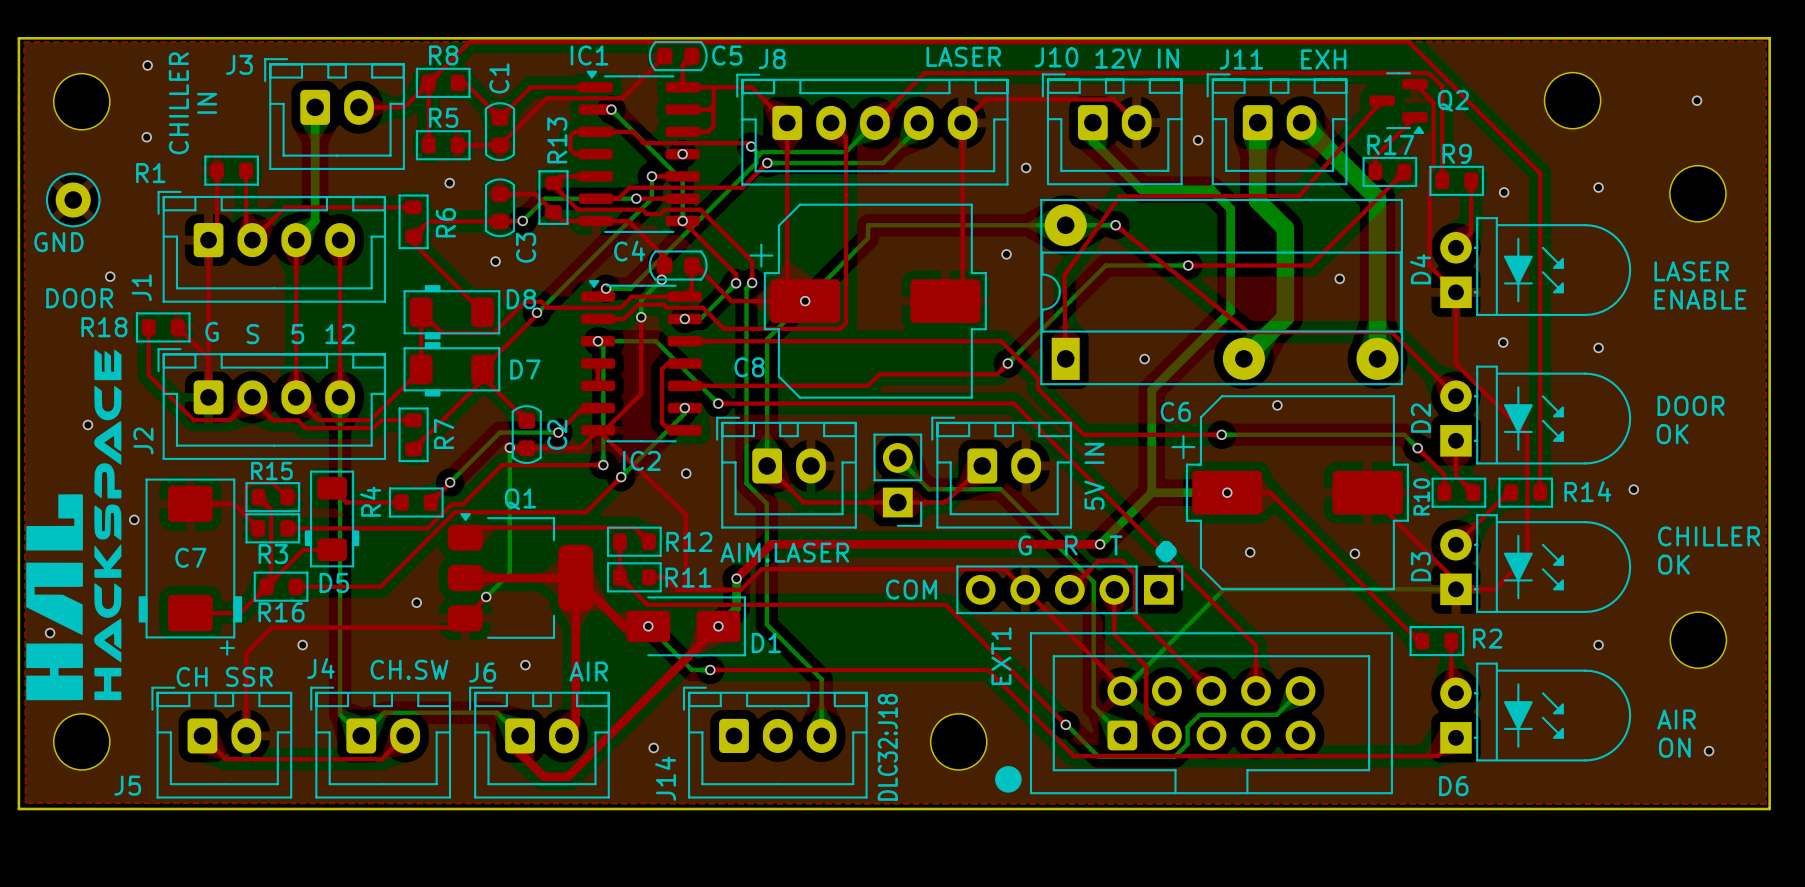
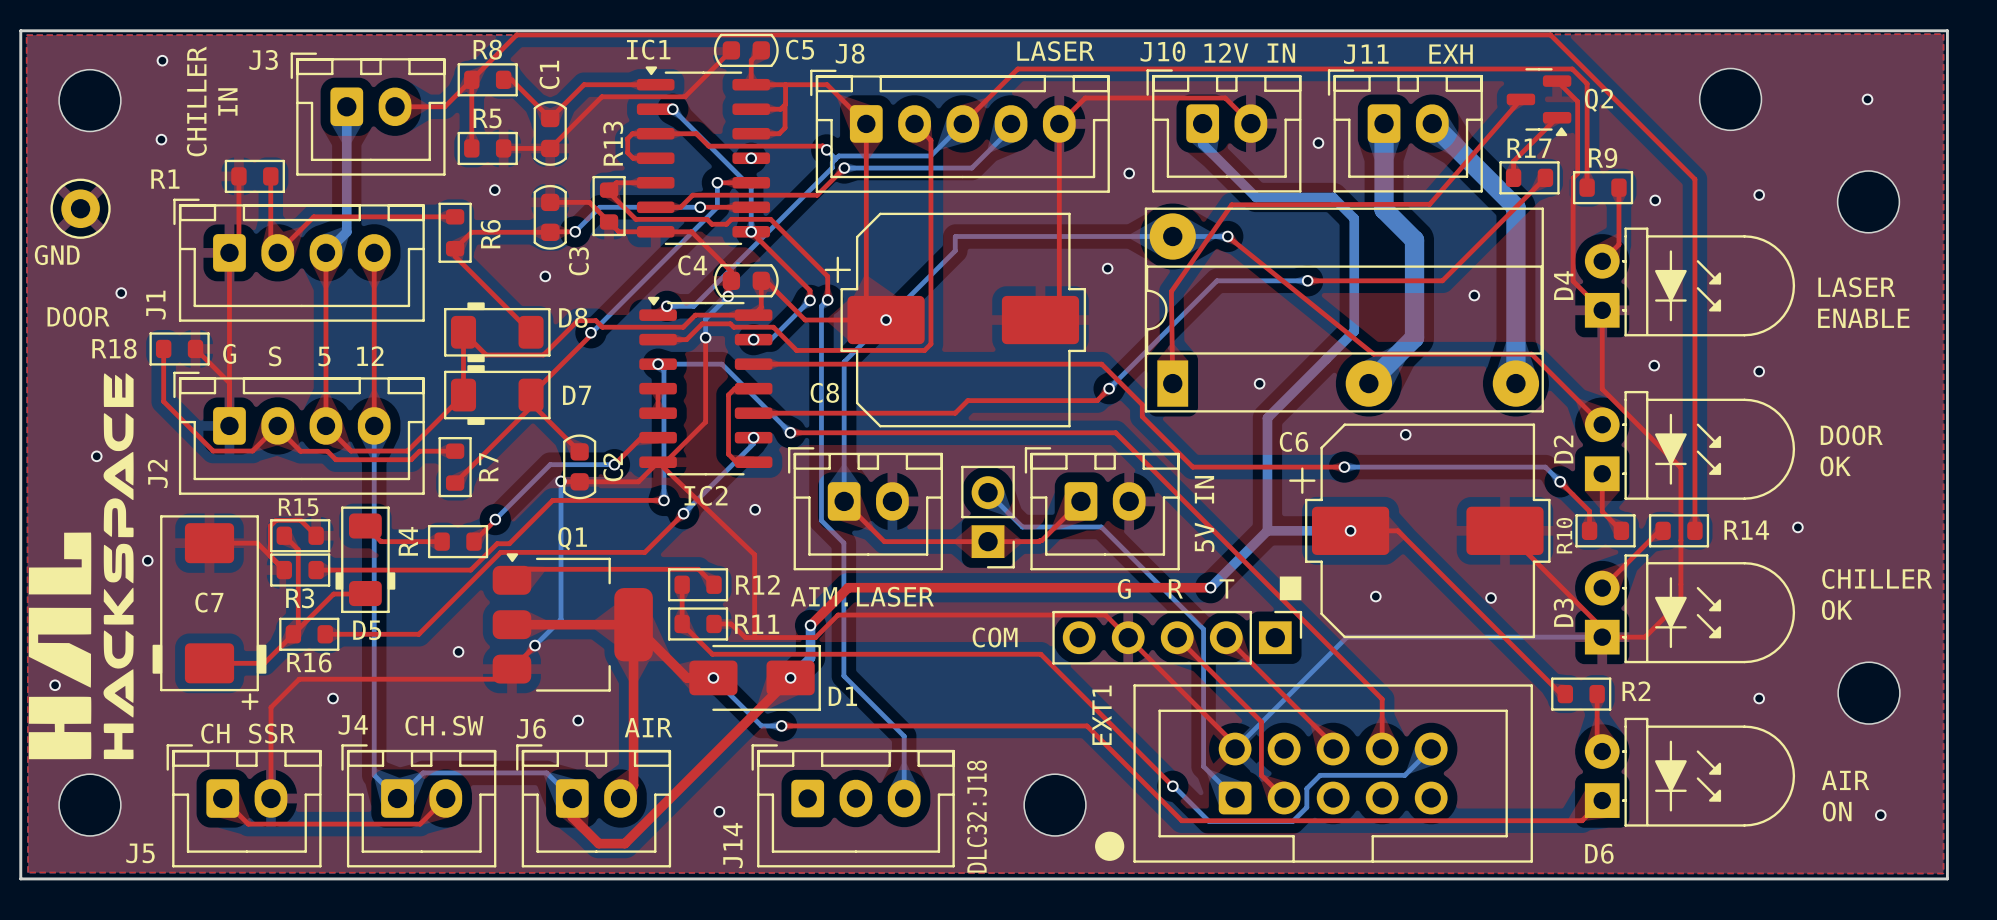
top track: (1069, 589) (1098, 560) (1121, 560) (1134, 573) (1134, 614) (1211, 690) -> none
top track: (1114, 589) (1114, 634) -> (1177, 637) (1226, 686)
top track: none -> (1226, 637) (1333, 744)

